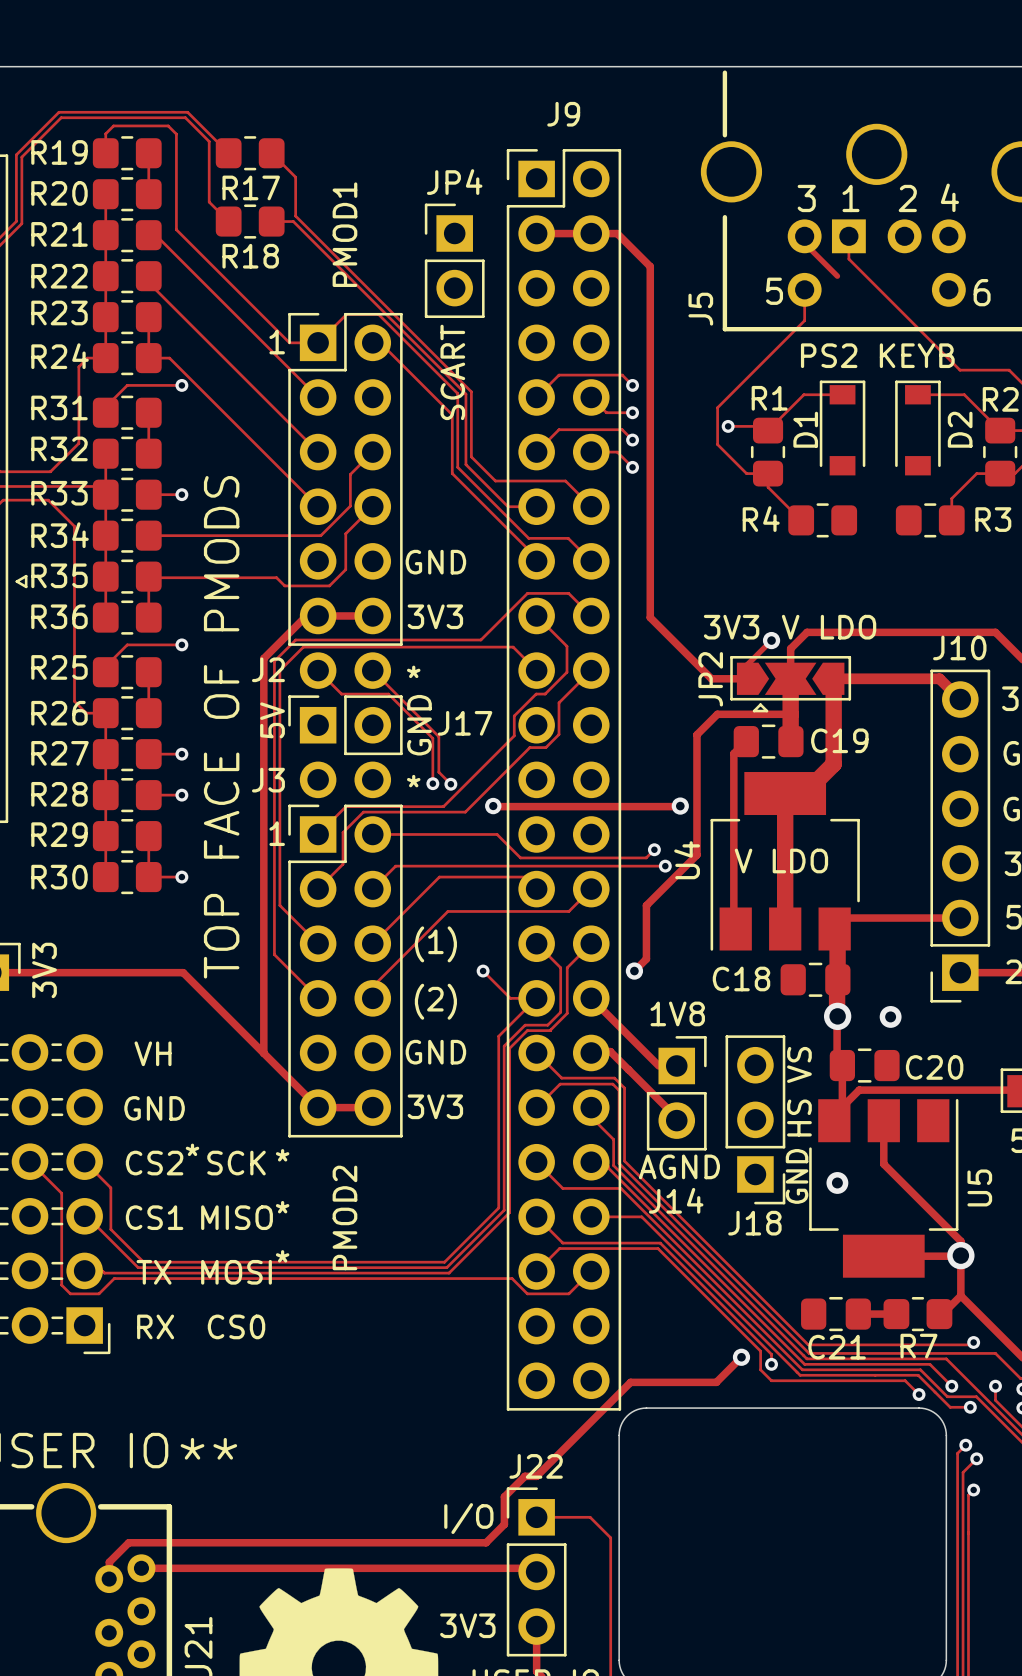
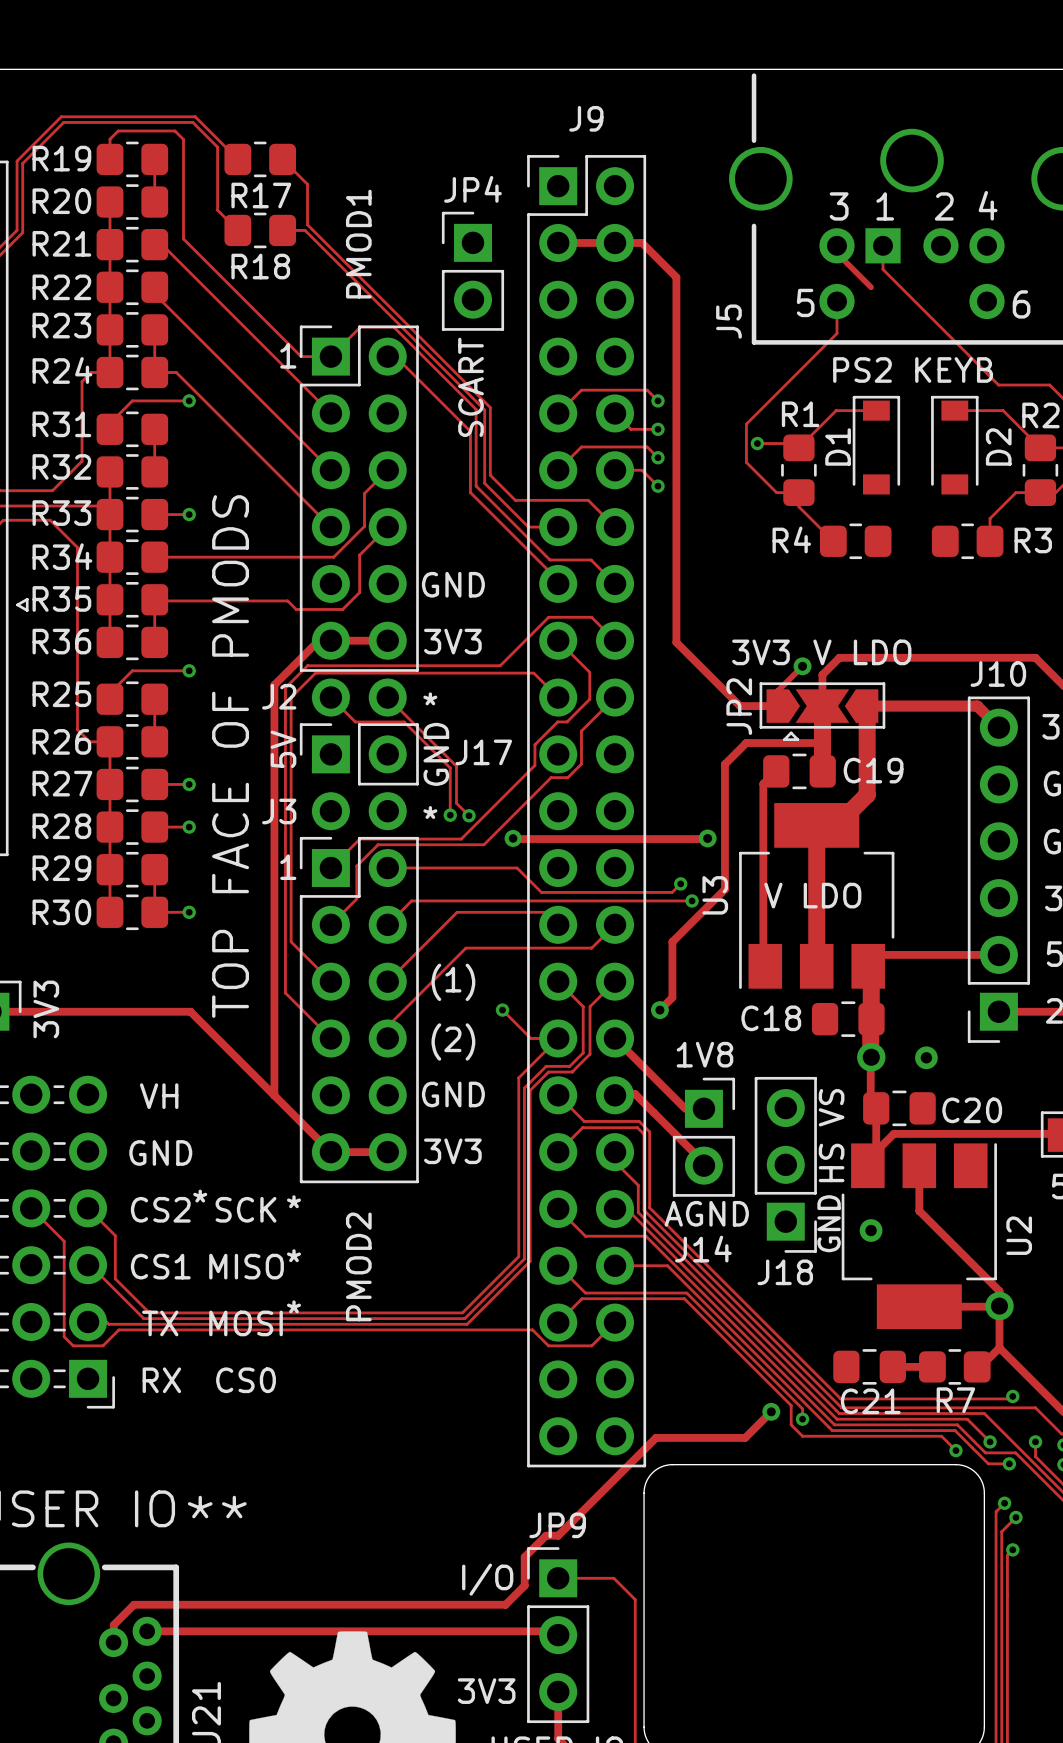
U4 name: U4 (687, 860) -> U3 (715, 895)
U5 name: U5 (979, 1187) -> U2 (1019, 1235)
J22 name: J22 (536, 1466) -> JP9 (557, 1525)

